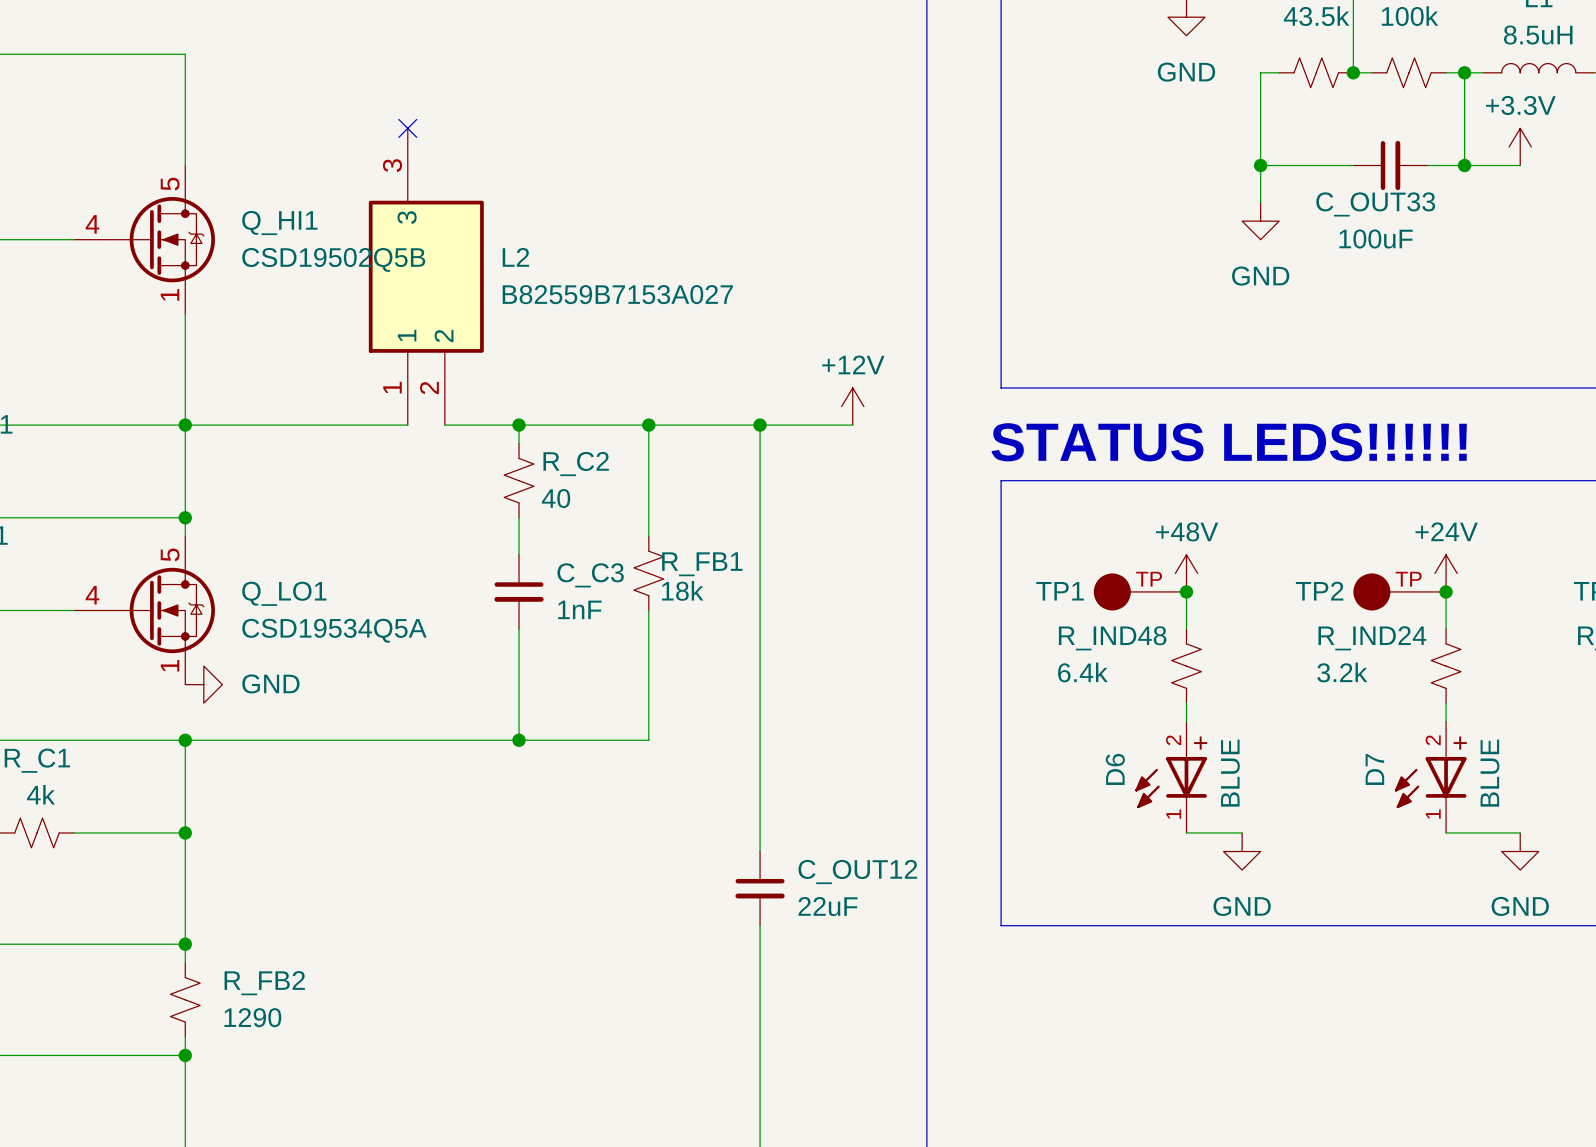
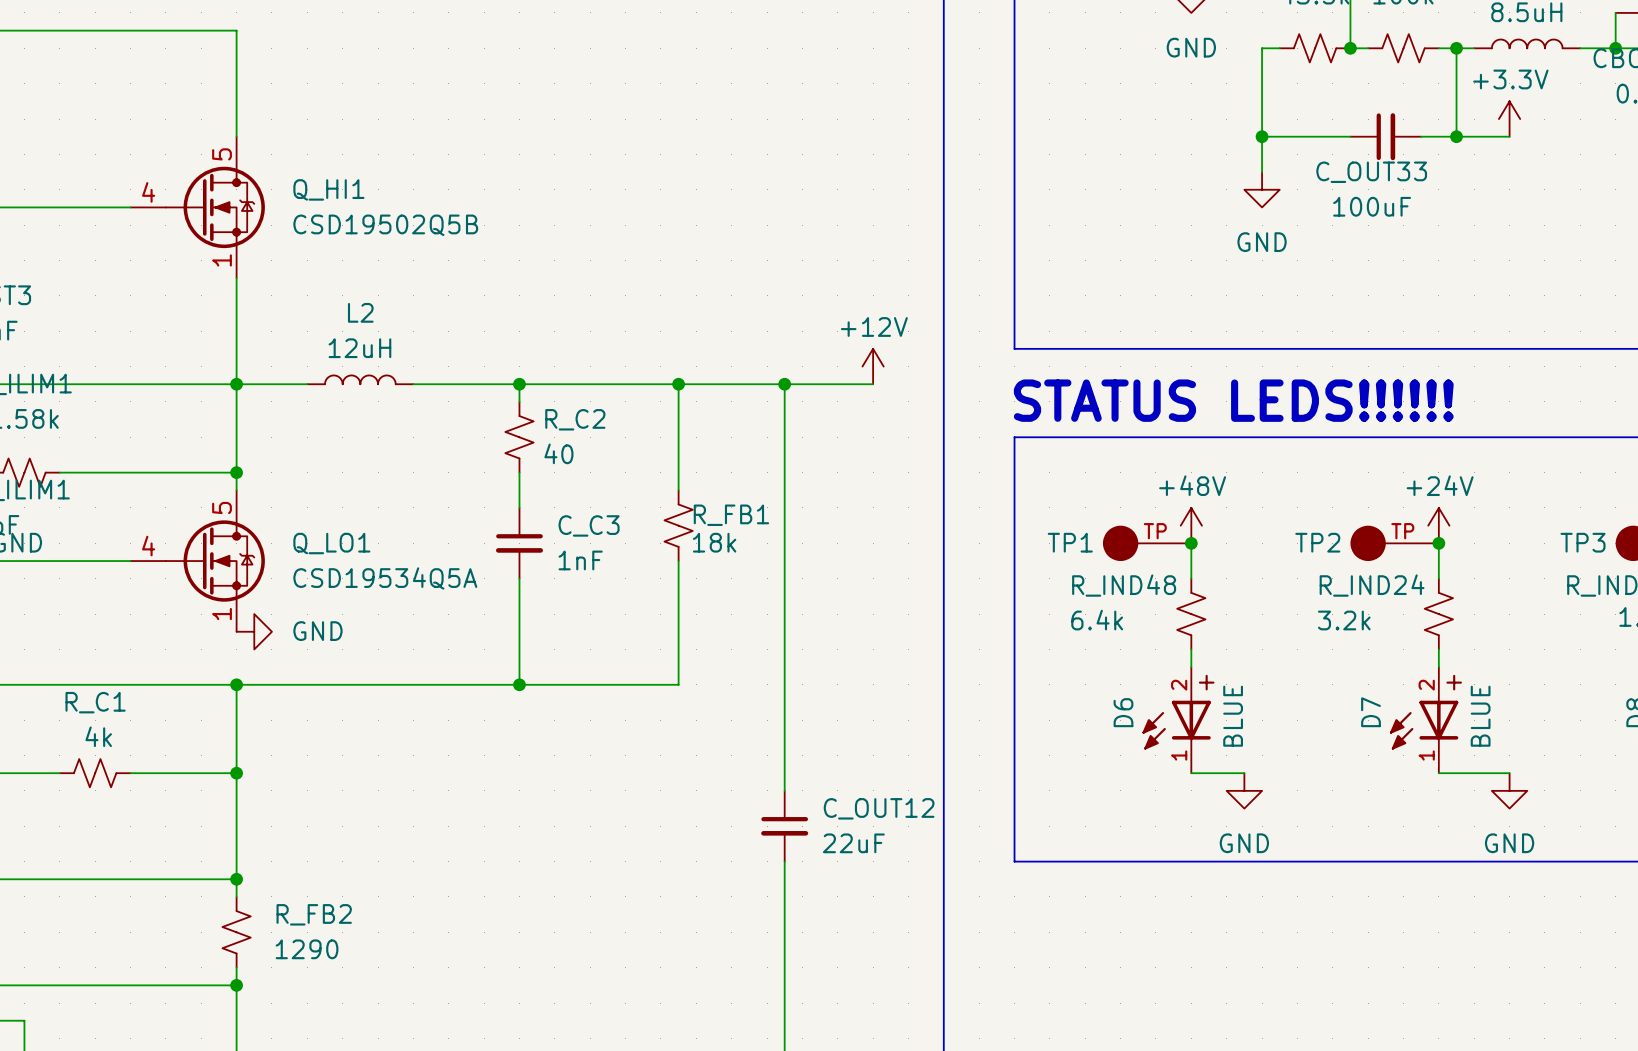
L2 symbol: [368, 128, 484, 426] -> [307, 375, 414, 385]
no-connect mark: (407, 128) -> none
L2 name position: L2 (515, 257) -> L2 (360, 312)
L2 value: B82559B7153A027 (617, 294) -> 12uH (359, 348)
wire: (259, 425) (370, 425) -> none
wire: none -> (448, 384) (484, 384)
wire: (519, 425) (519, 443) -> (519, 384) (519, 401)
junction position: (519, 425) -> (519, 384)
R_C2 position: (519, 480) -> (519, 437)
wire: (519, 517) (519, 554) -> (519, 472) (519, 507)
C_C3 position: (519, 591) -> (519, 543)
wire: (519, 629) (519, 740) -> (519, 578) (519, 684)
junction position: (519, 740) -> (519, 684)

